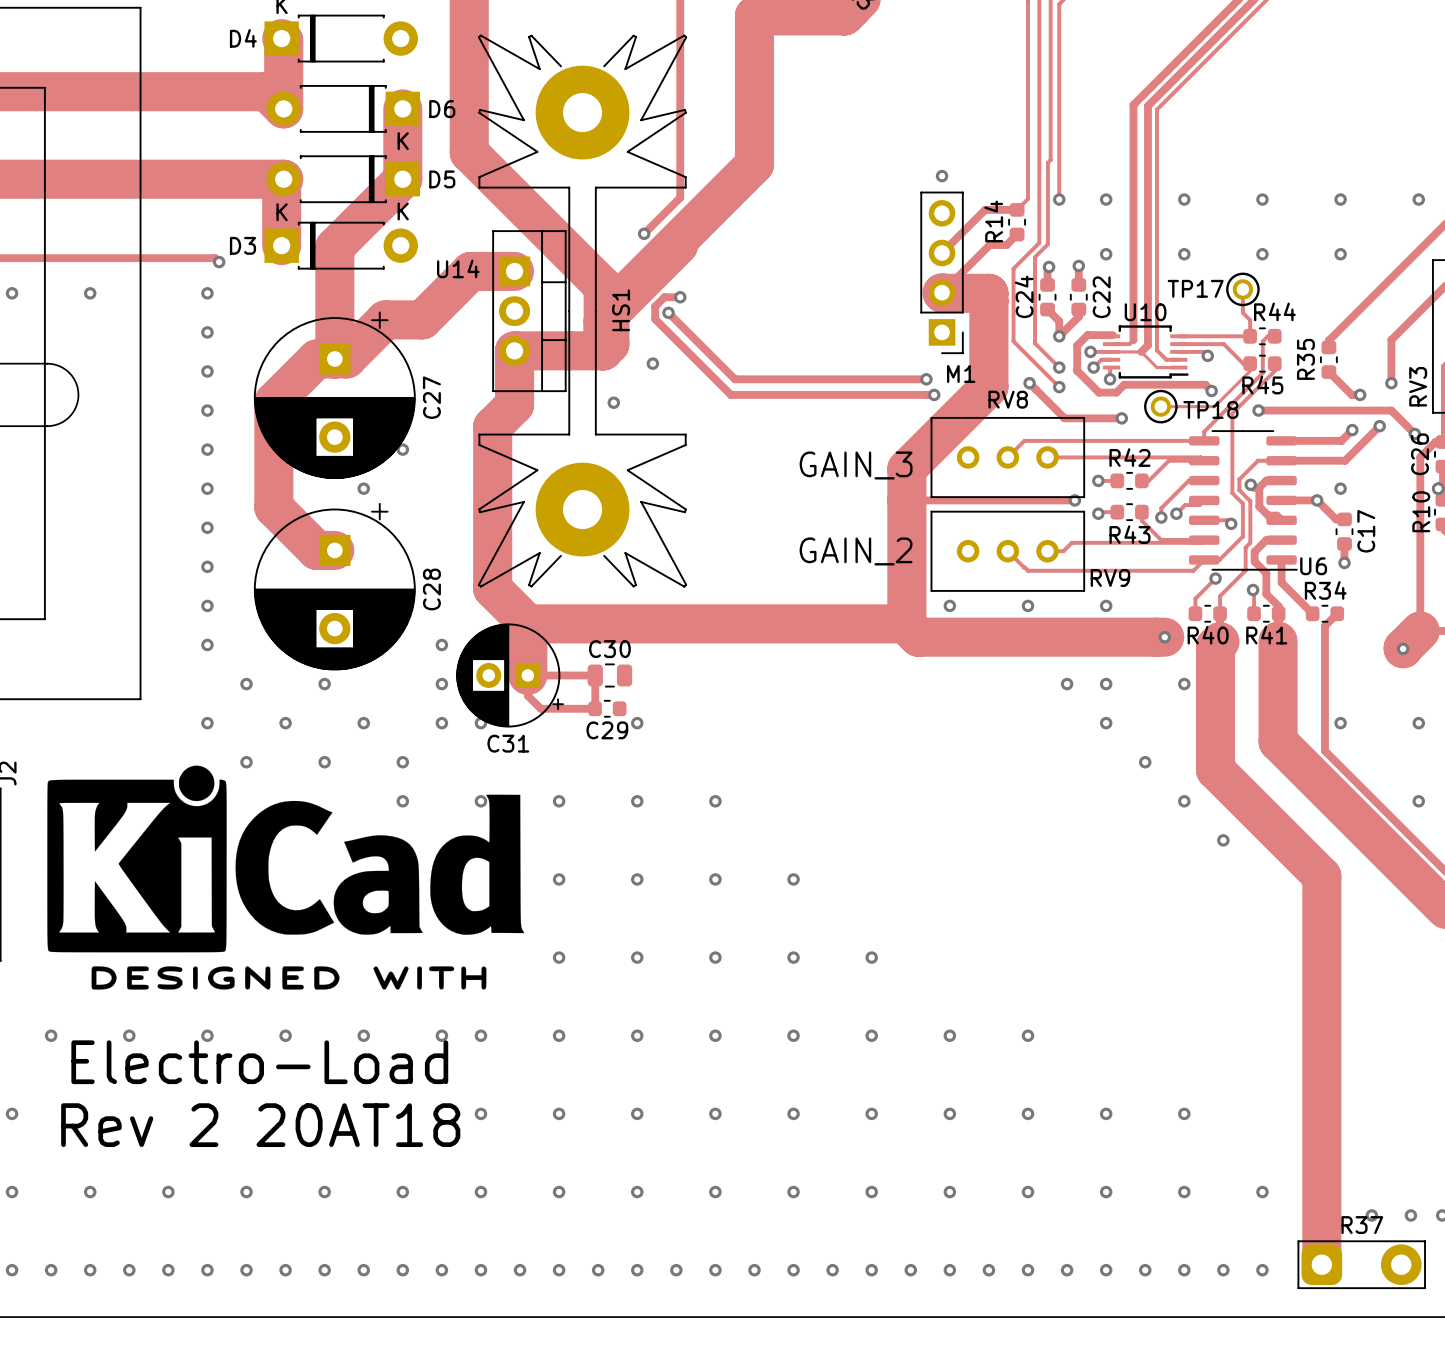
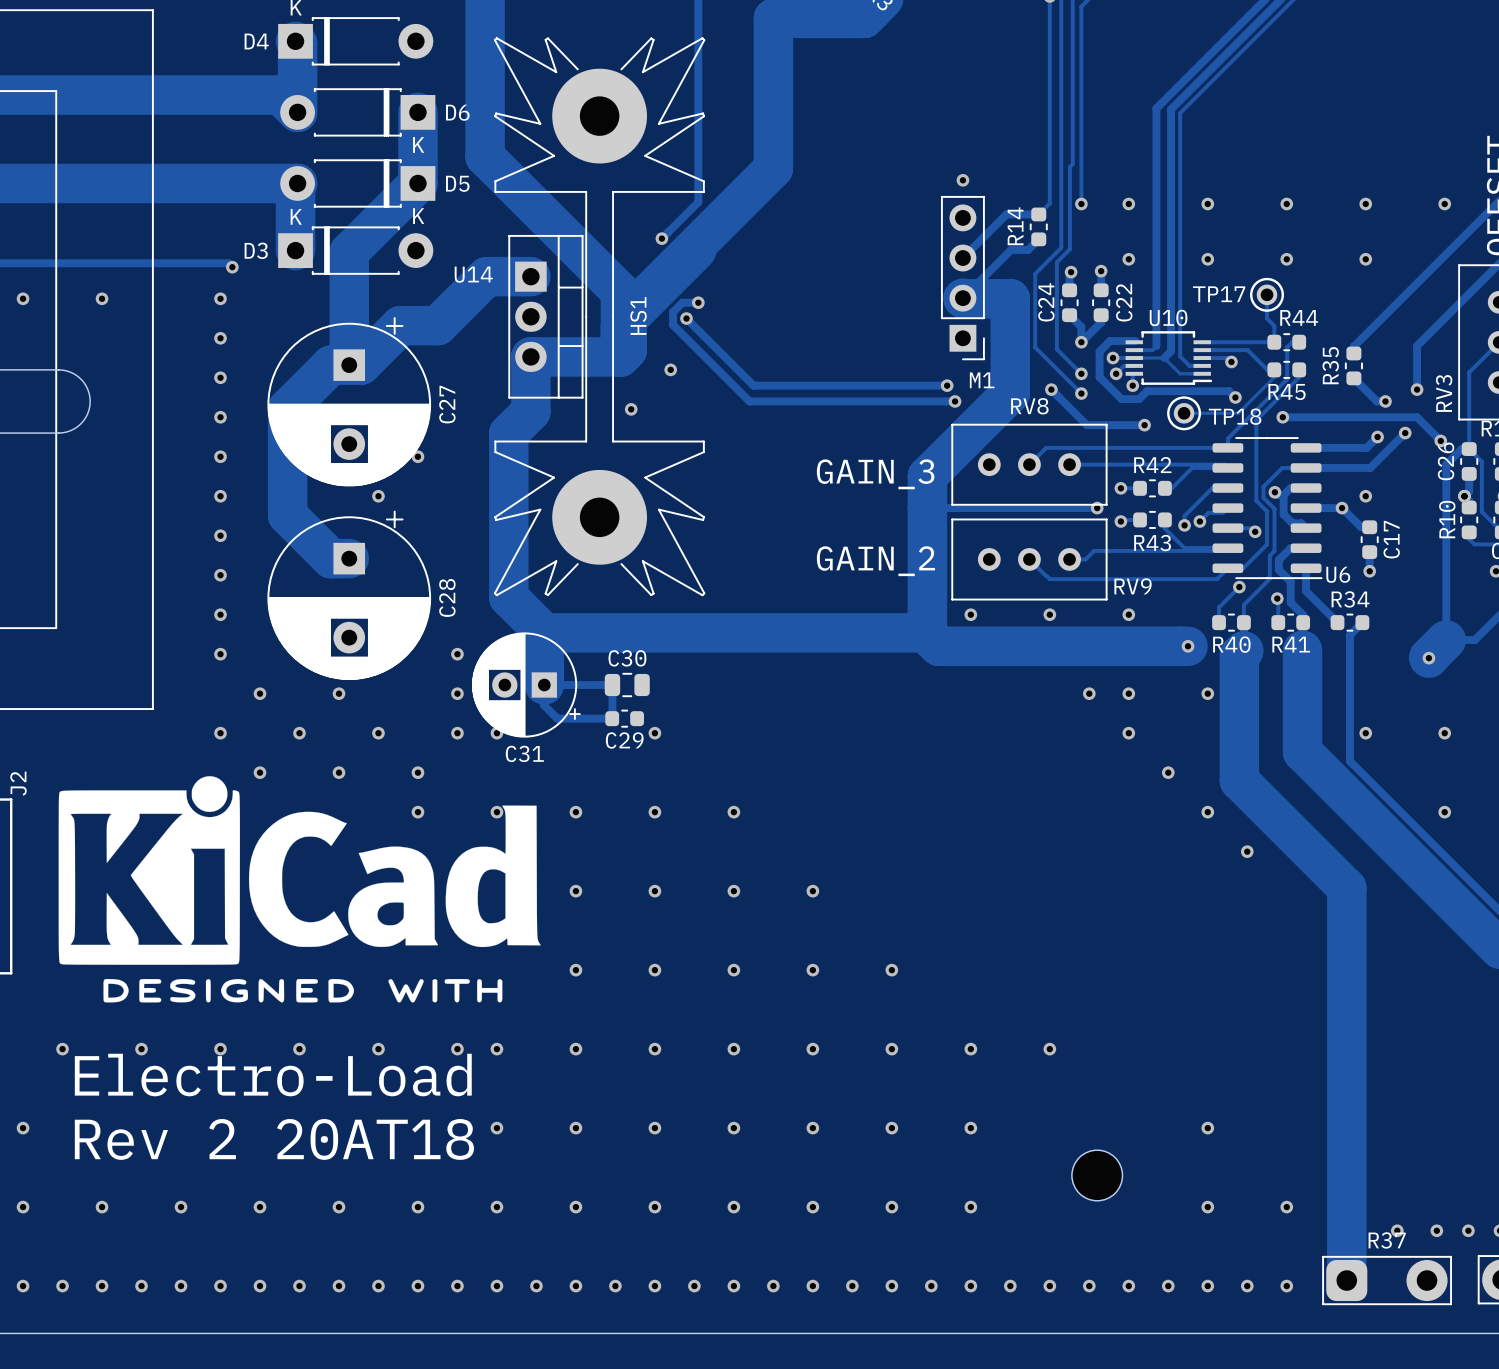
via: (1028, 1113) -> none
via: (1106, 1113) -> none
part: none -> (1097, 1175)
via: (1028, 1192) -> none
via: (1106, 1192) -> none

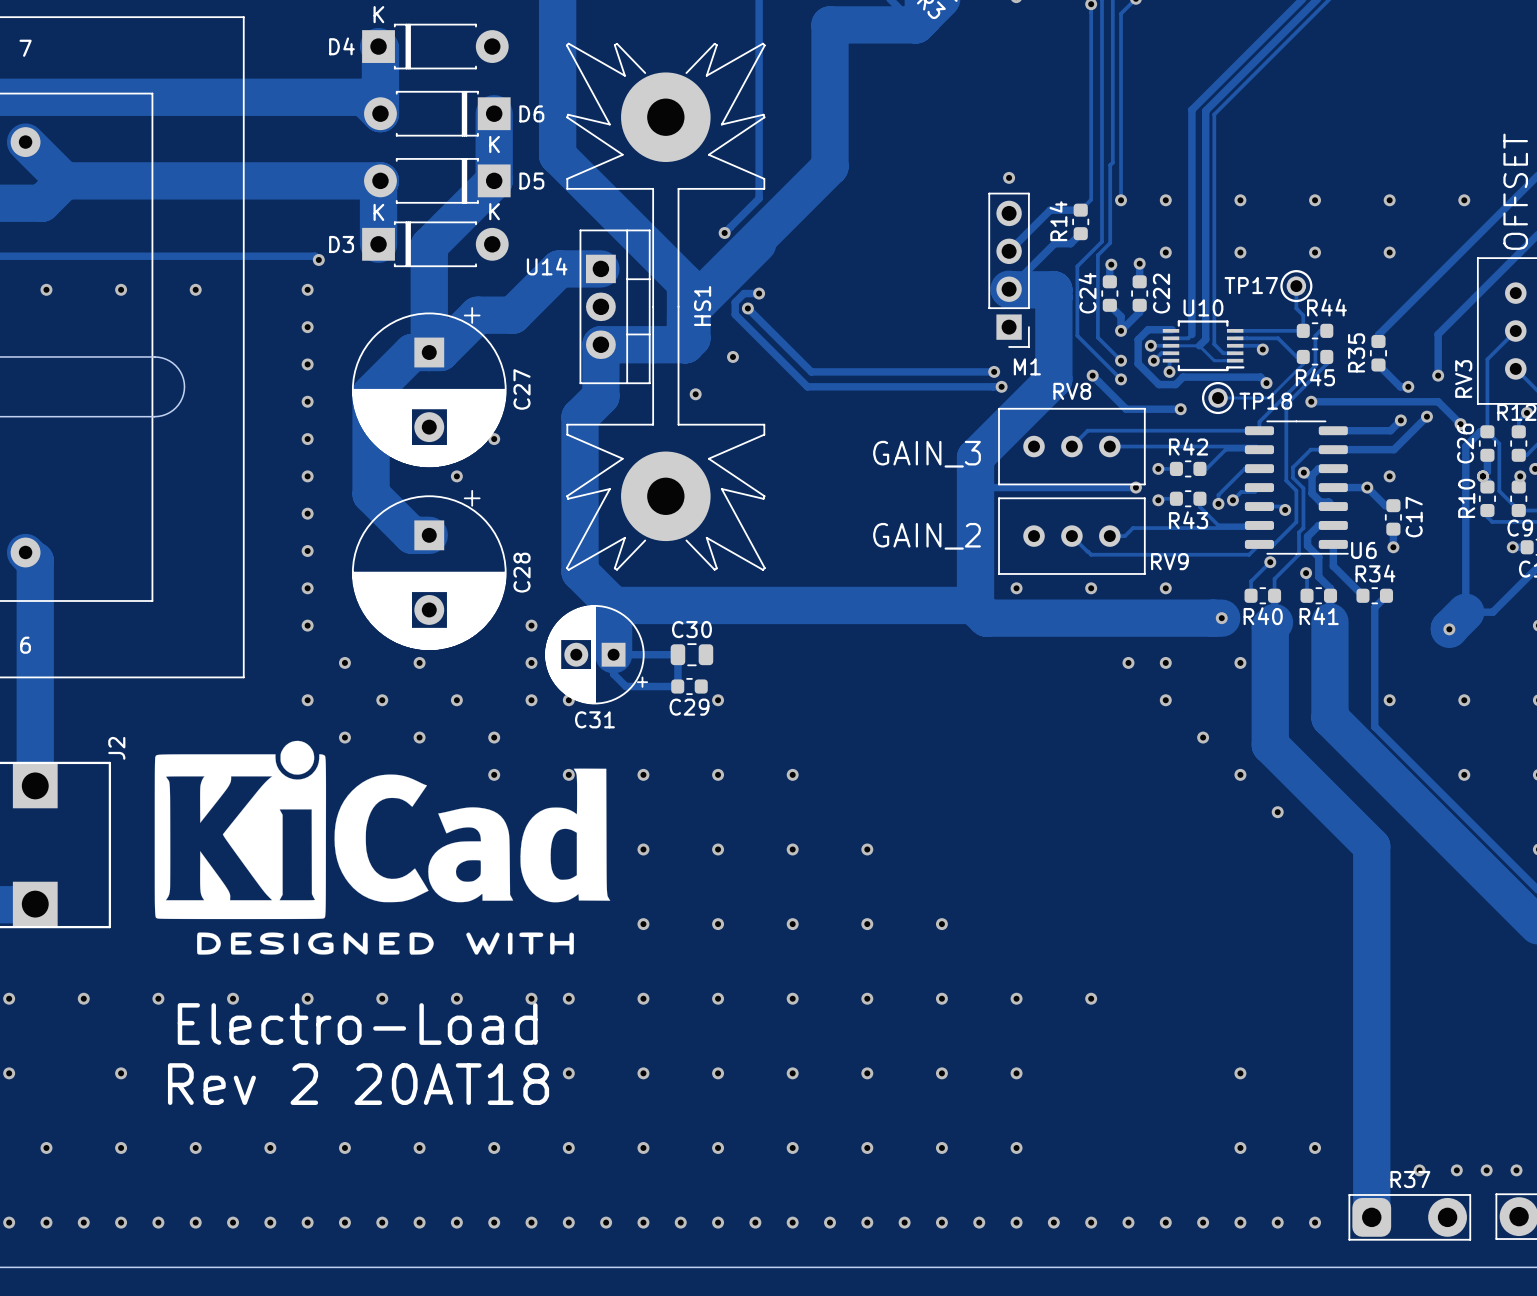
part: (1097, 1175) -> none

